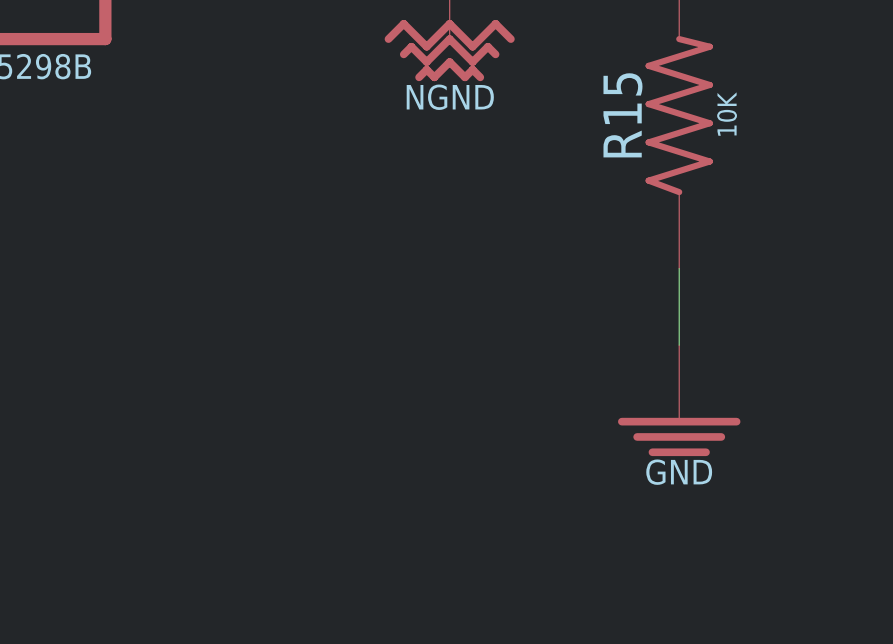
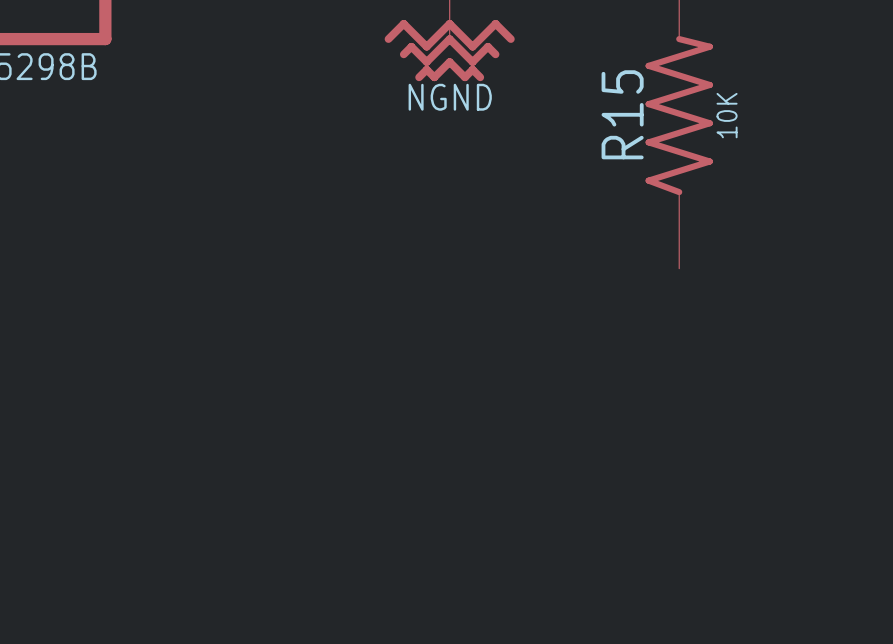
wire: (679, 268) (679, 345) -> none
power symbol: (679, 400) -> none

